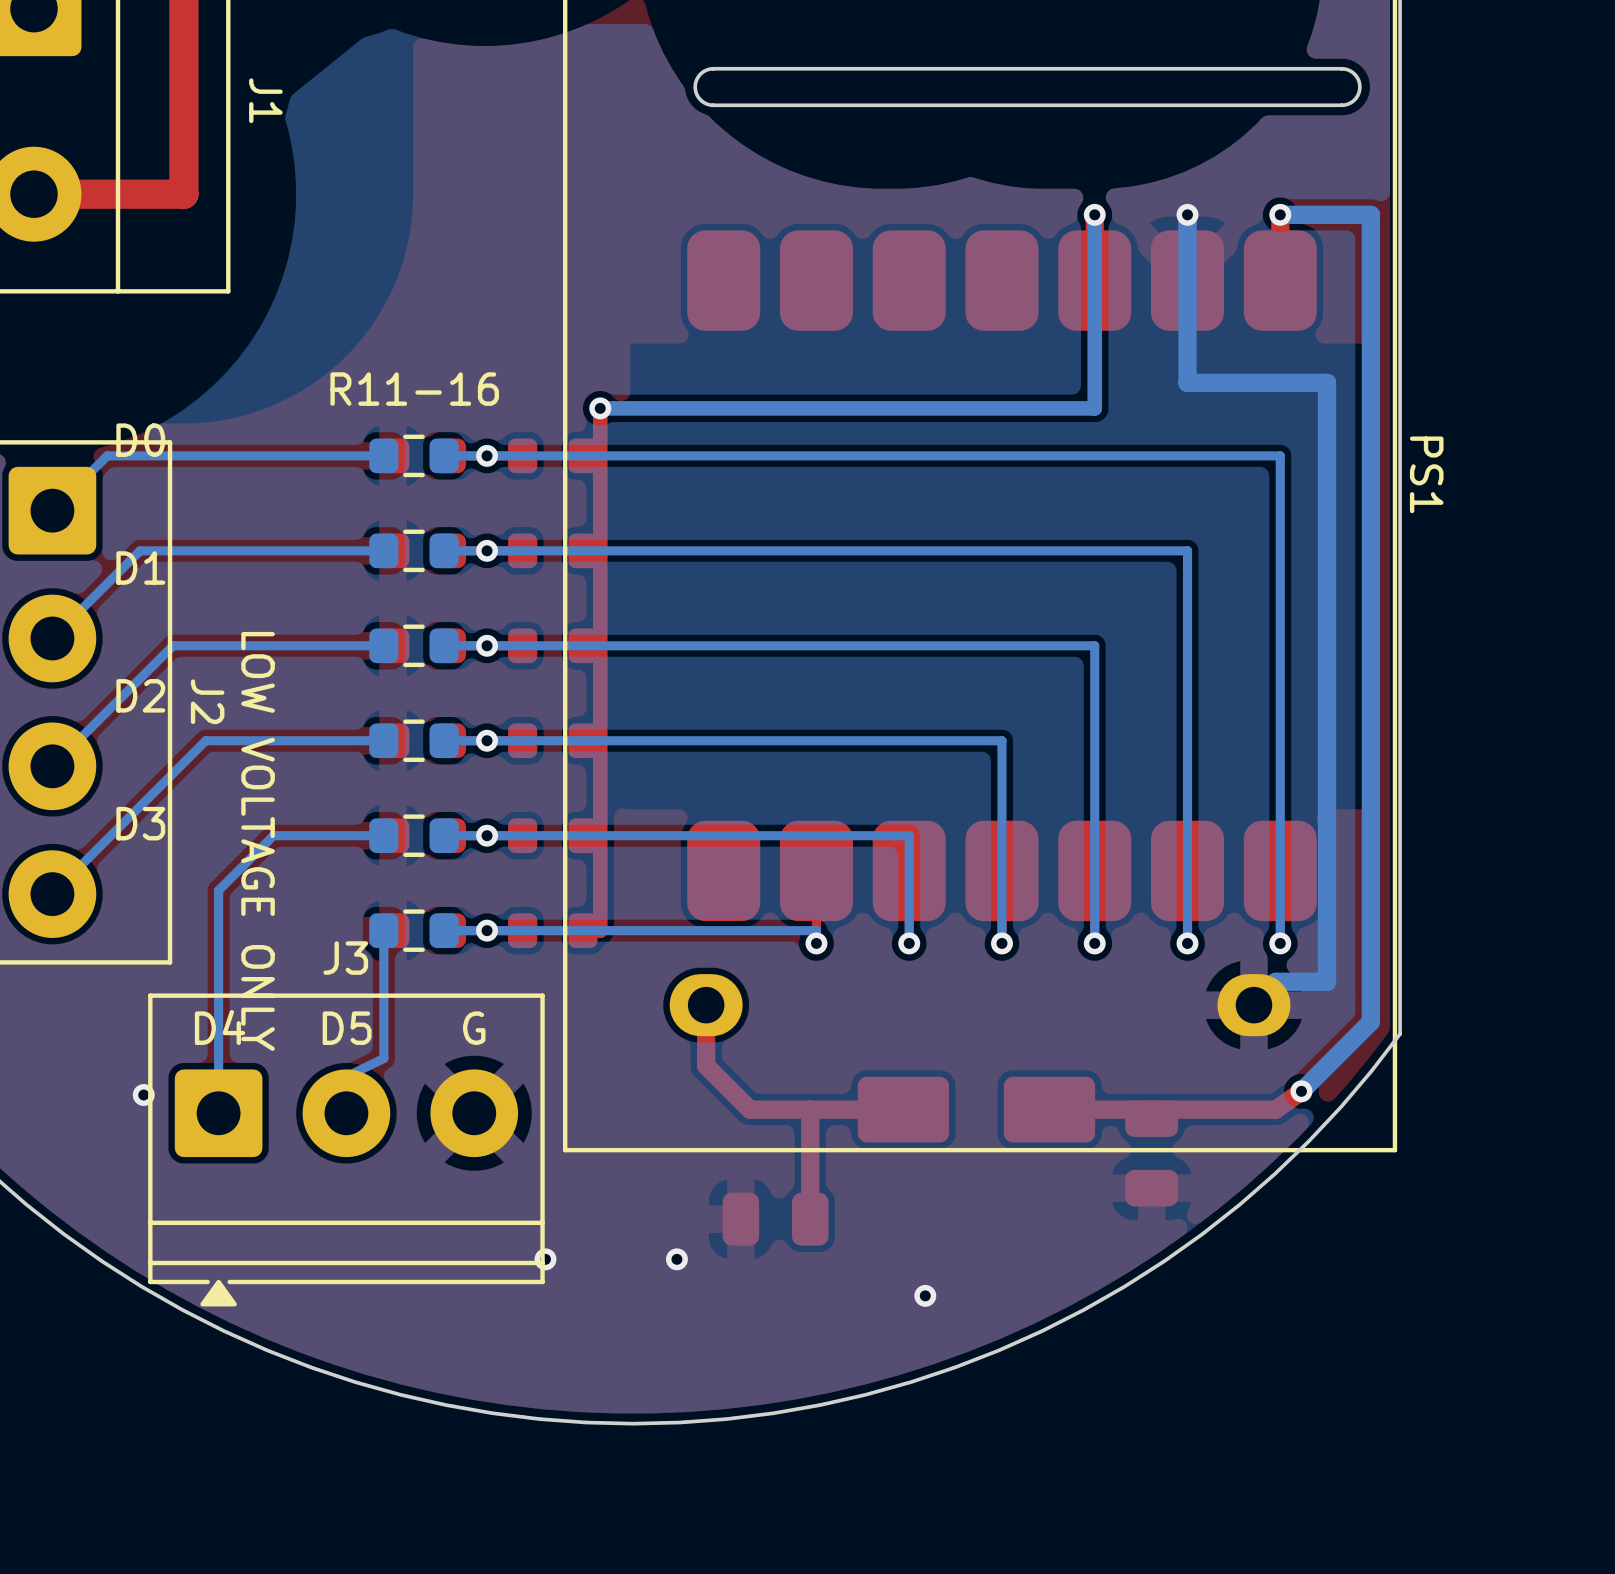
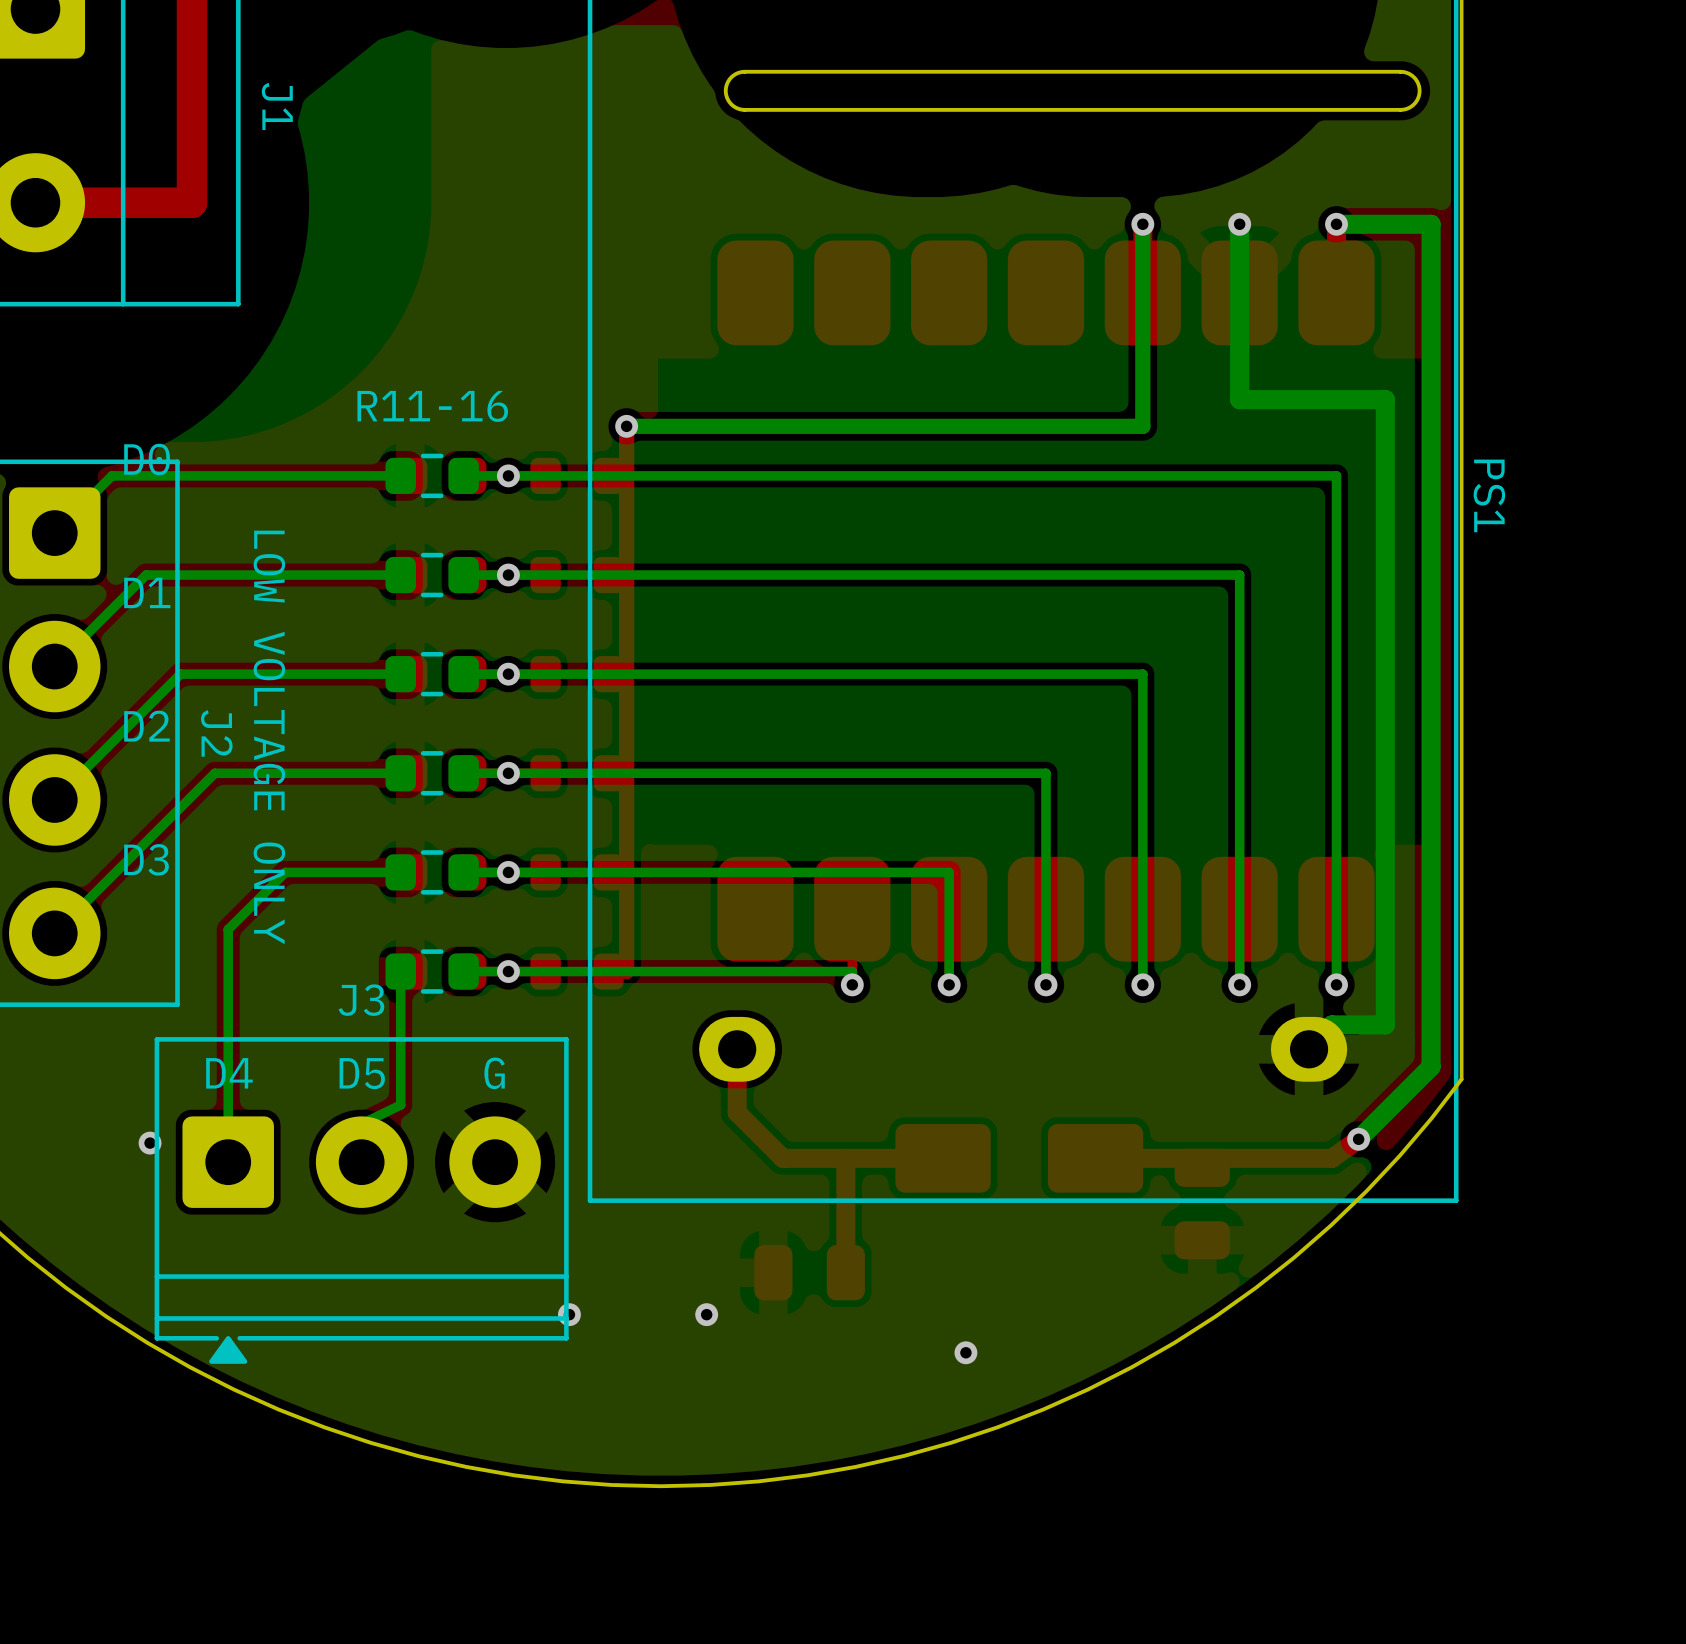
text position: LOW VOLTAGE ONLY (258, 841) -> LOW VOLTAGE ONLY (269, 737)

